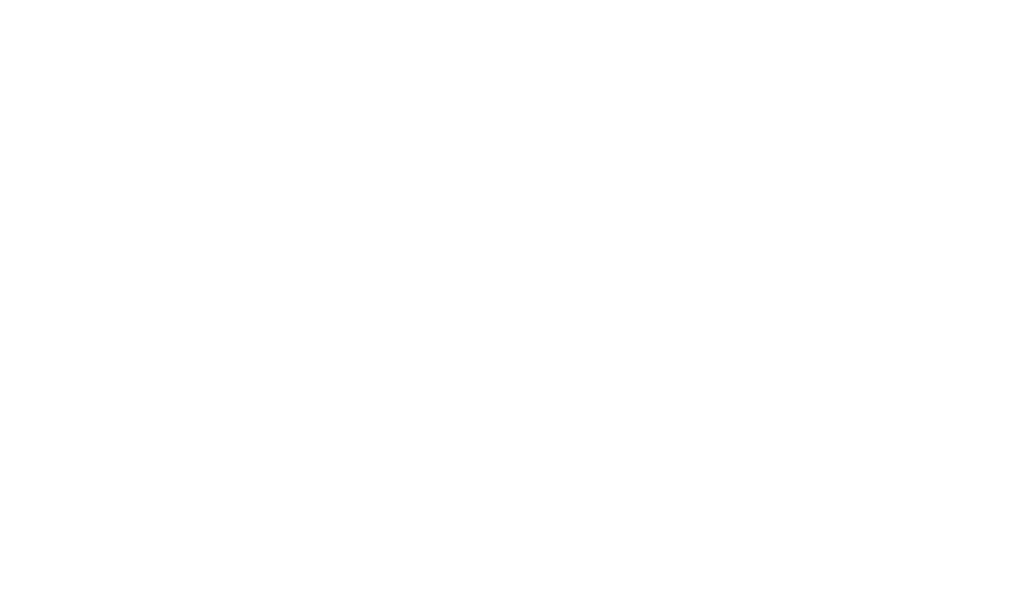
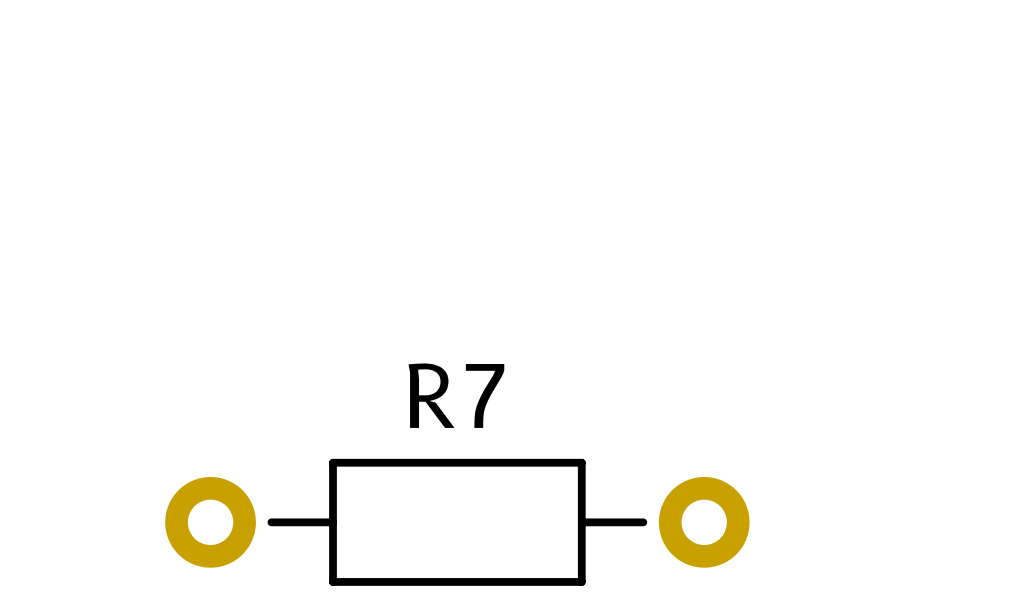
R7: none -> (457, 522)

